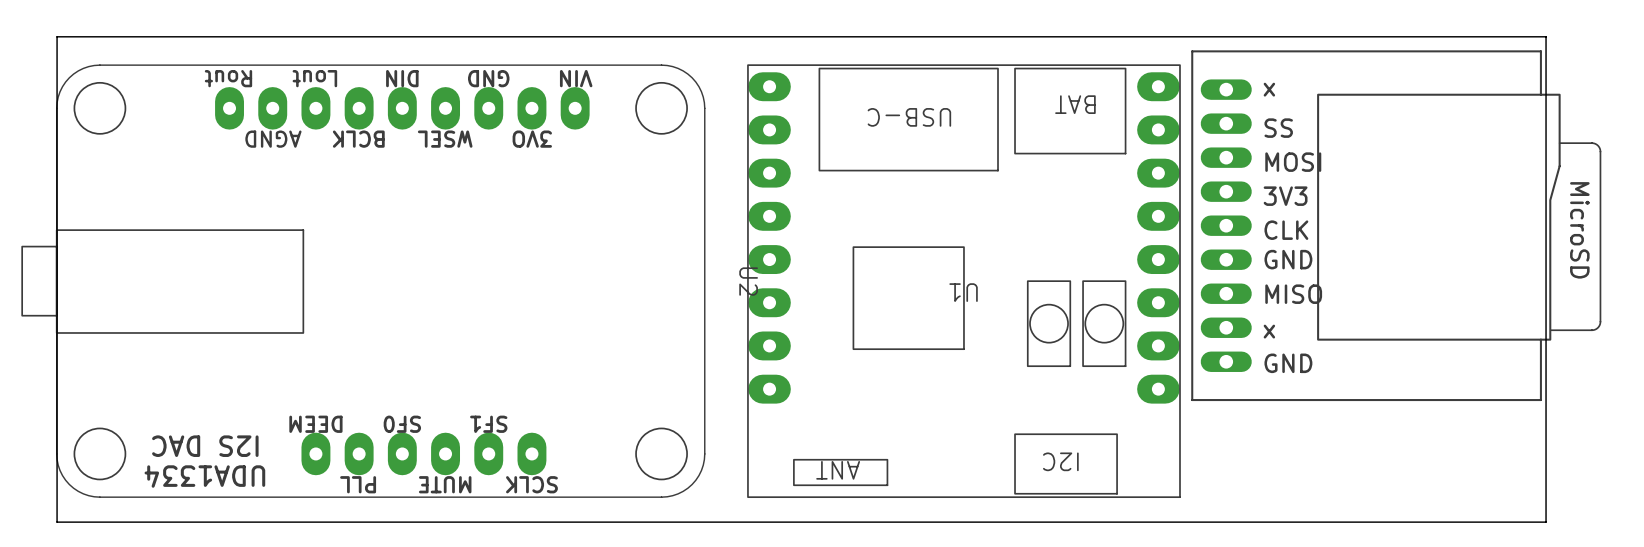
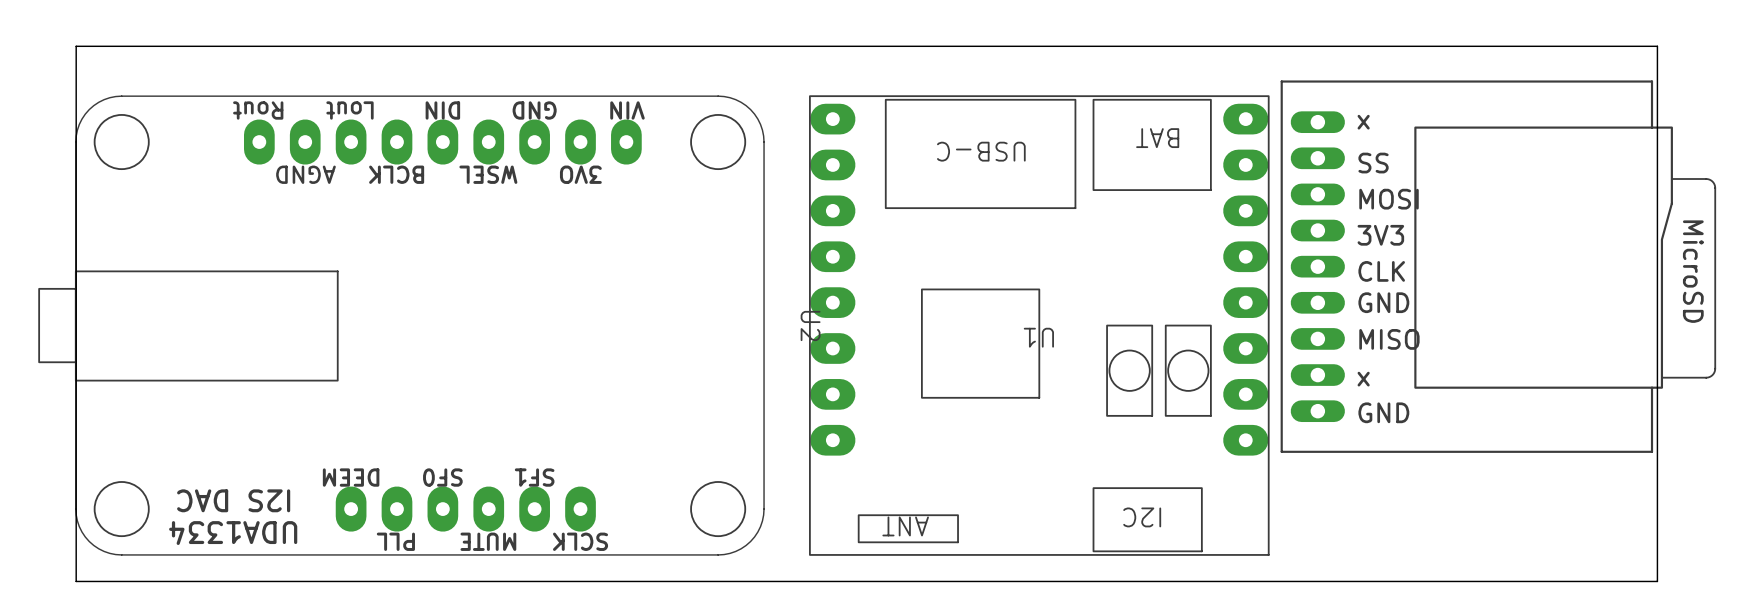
board edge: (57, 36) (1546, 36) -> (76, 66) (76, 46) (1657, 46) (1657, 66)

